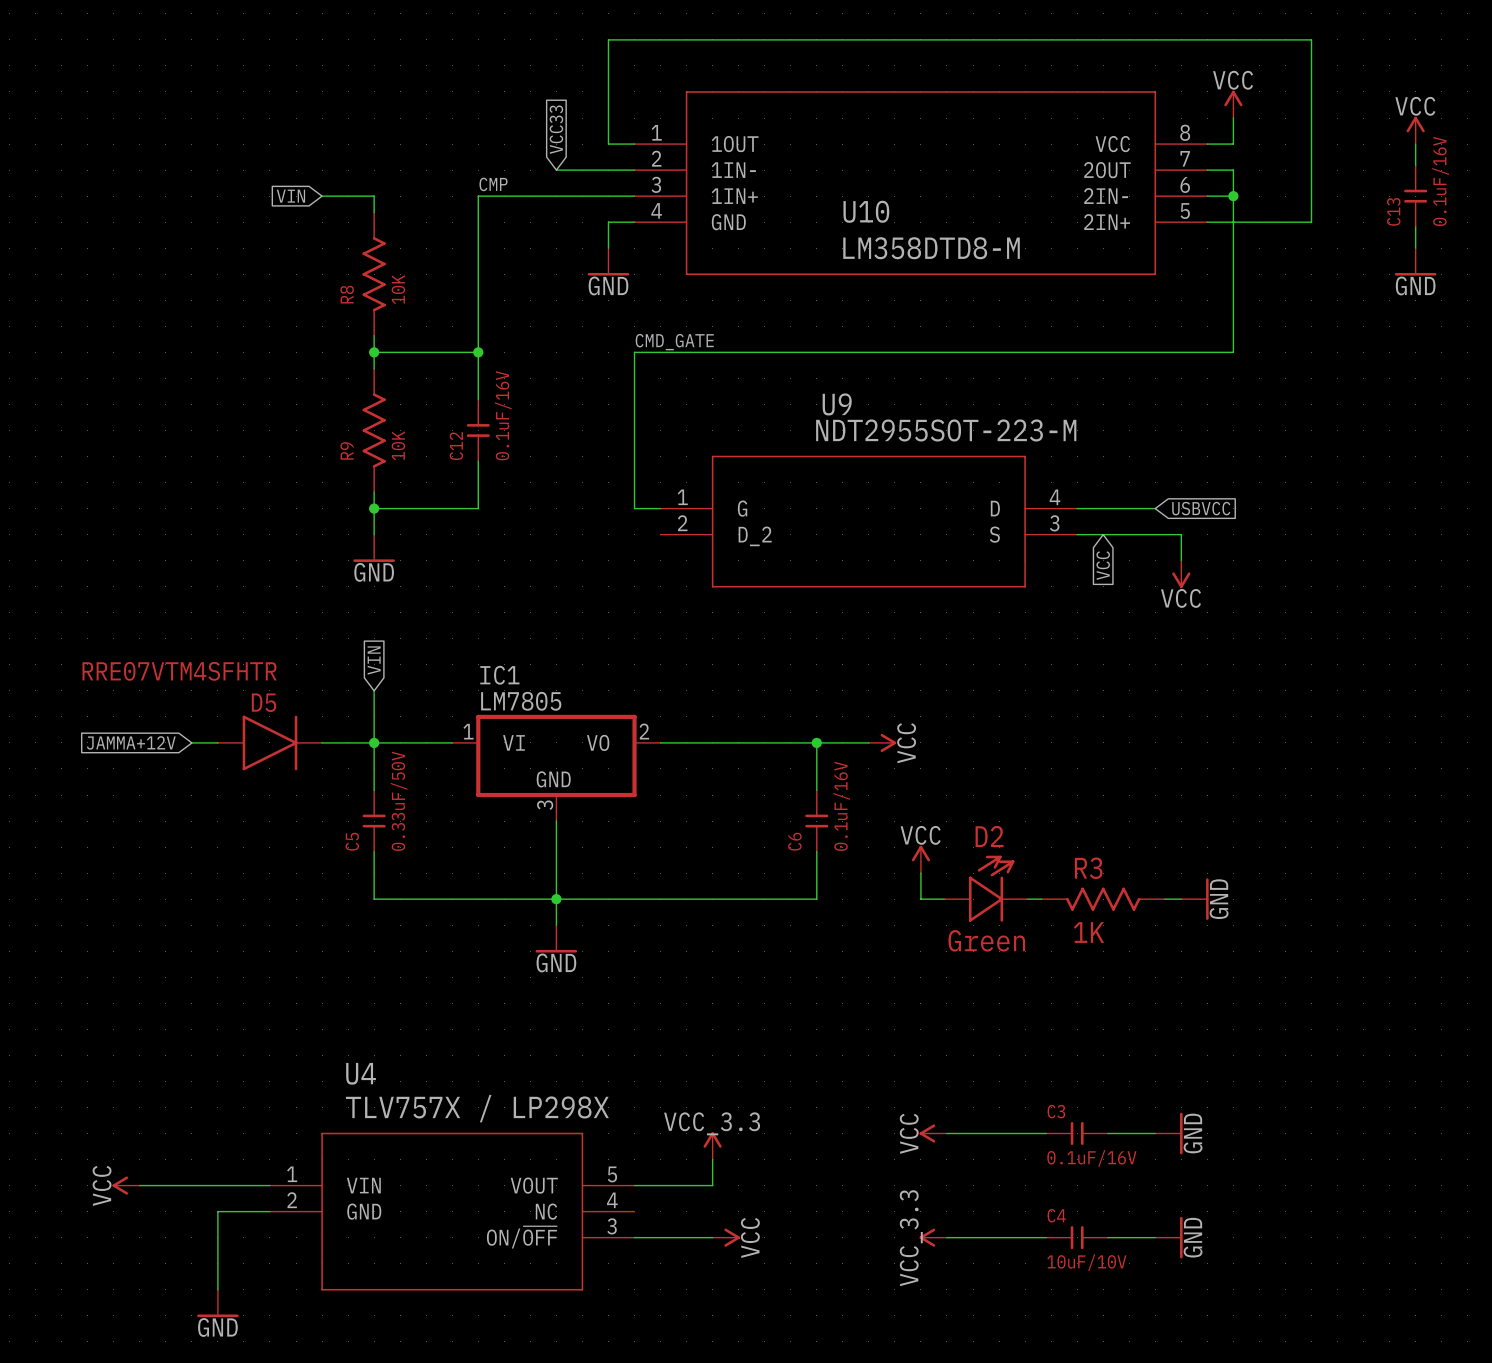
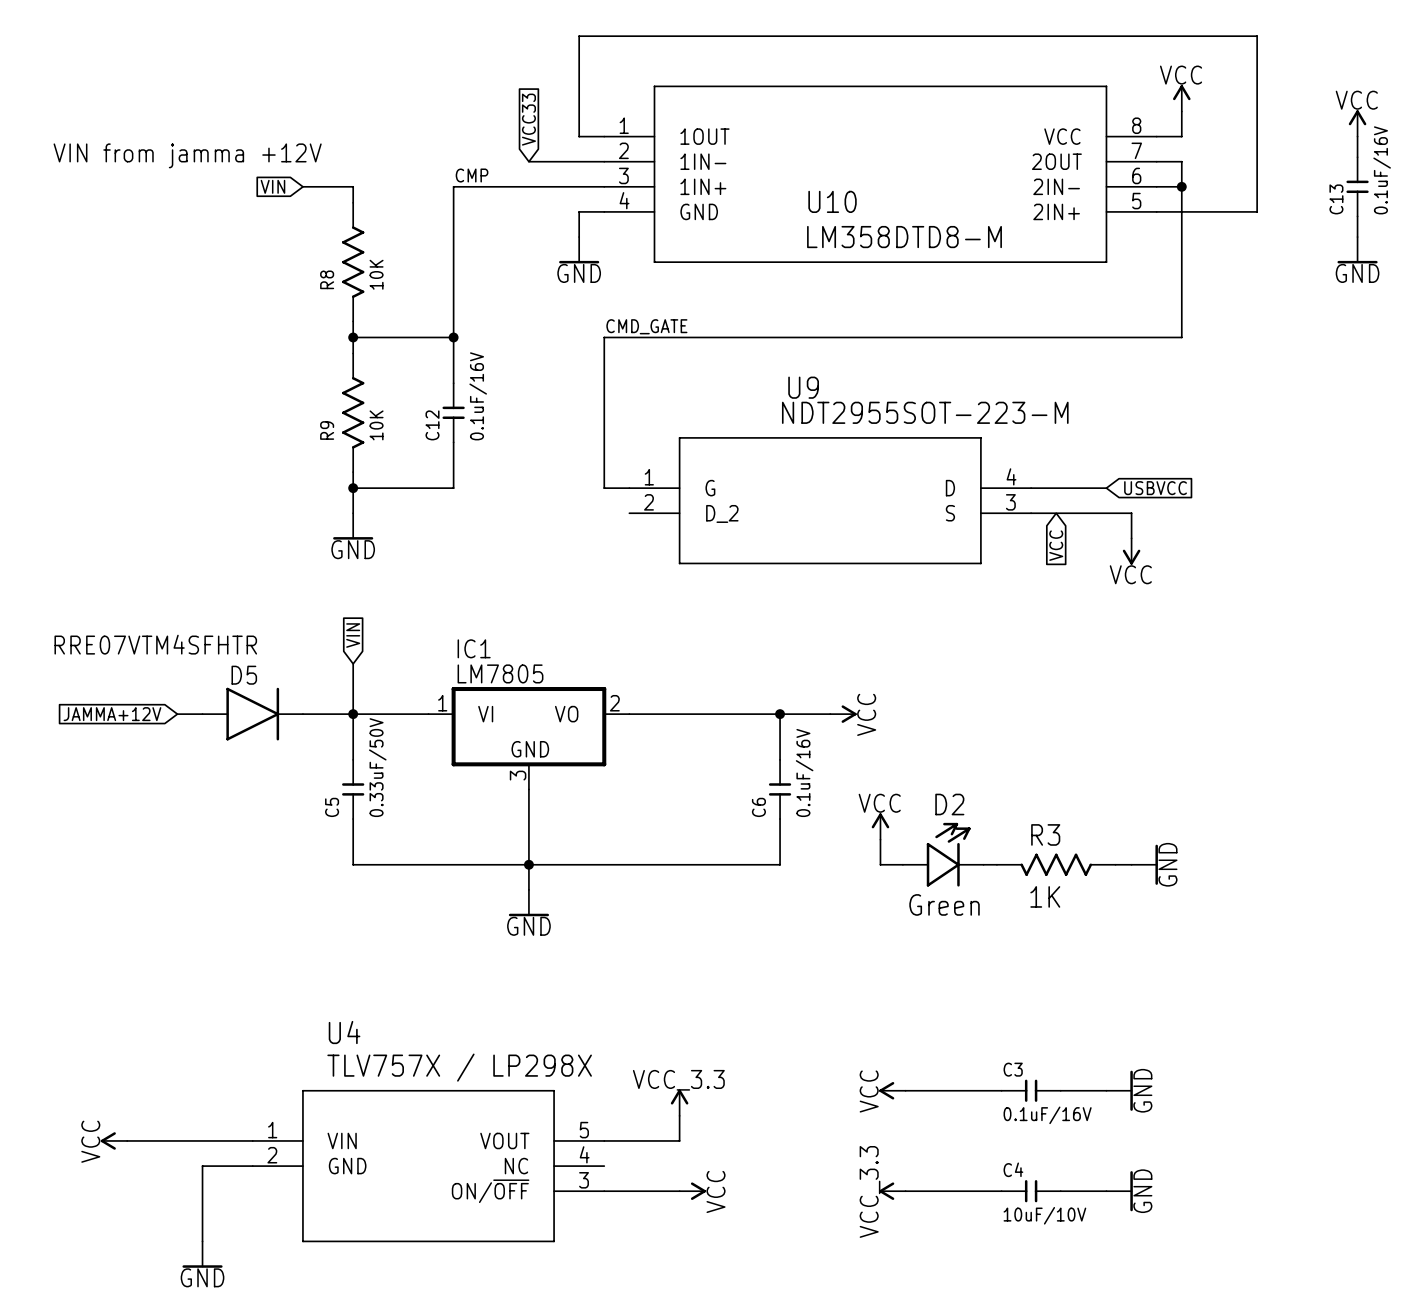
text: none -> VIN from jamma +12V (187, 155)

